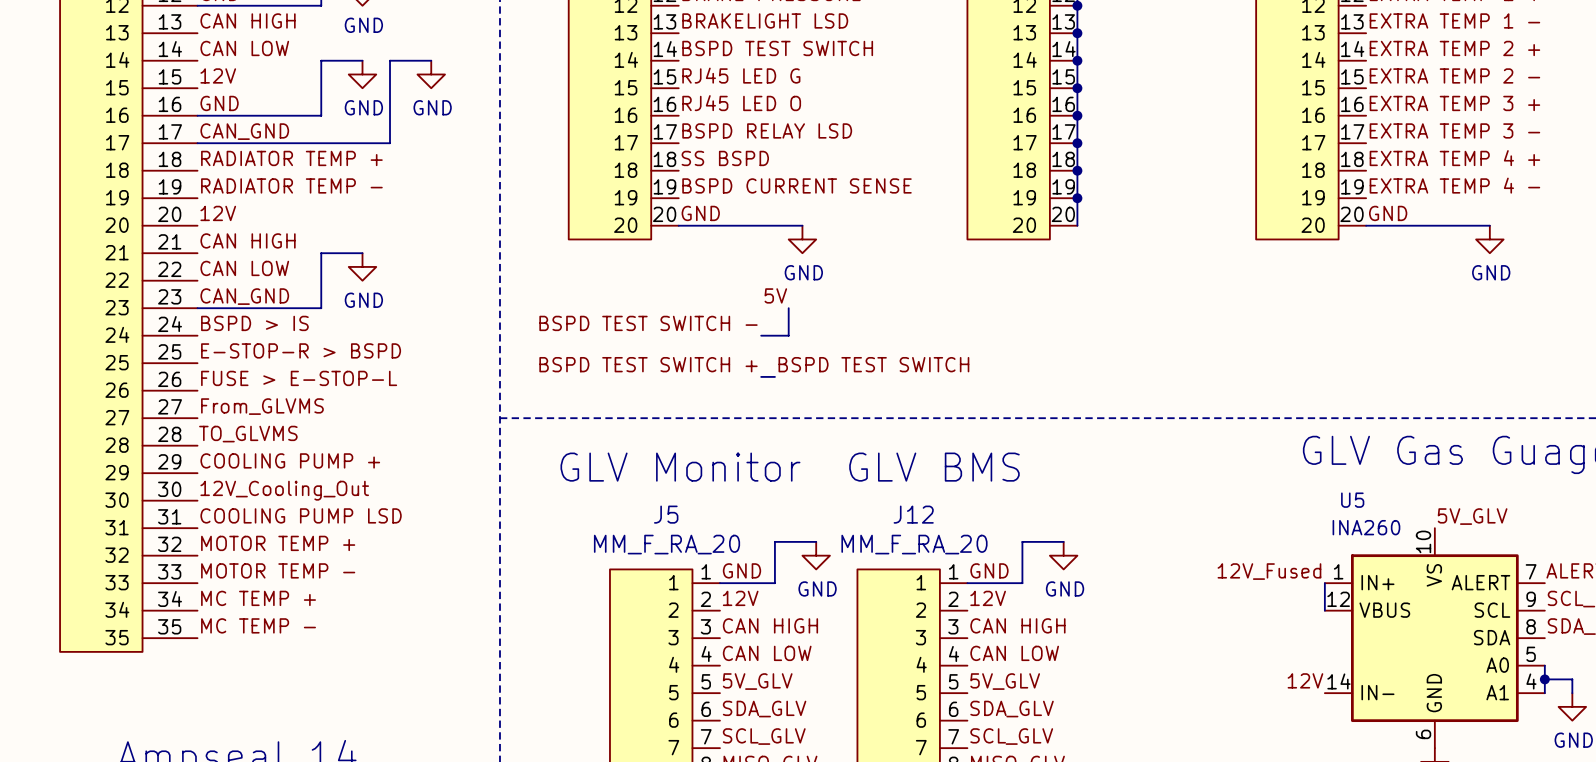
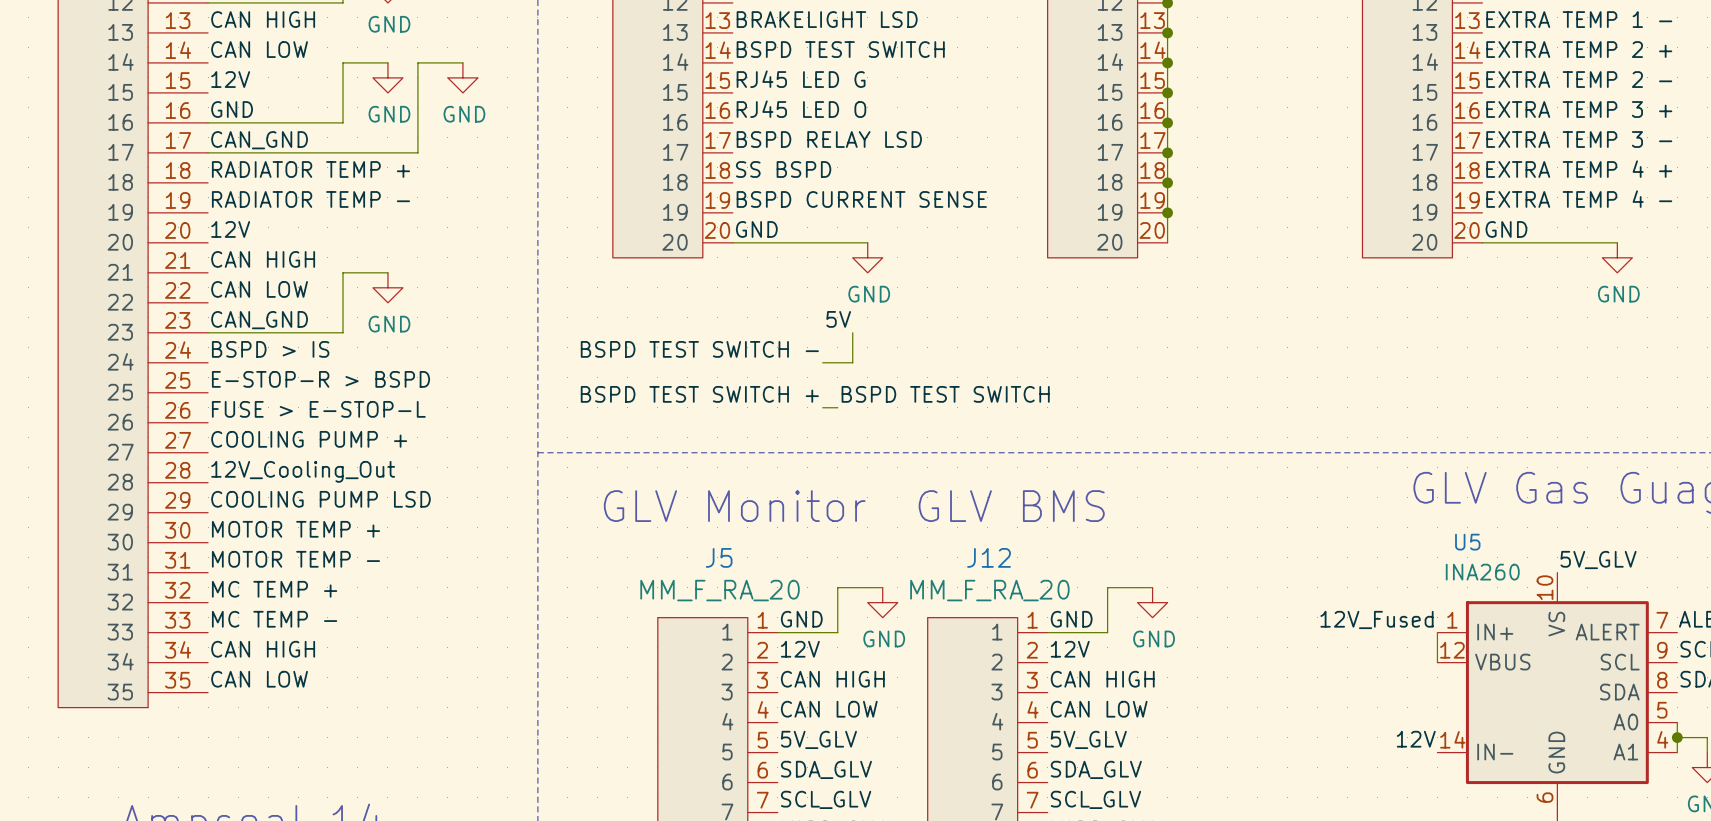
label: From_GLVMS (262, 406) -> COOLING PUMP + (309, 439)
label: TO_GLVMS (248, 434) -> 12V_Cooling_Out (303, 471)
label: COOLING PUMP + (290, 460) -> COOLING PUMP LSD (320, 499)
label: 12V_Cooling_Out (284, 490) -> MOTOR TEMP + (295, 529)
label: COOLING PUMP LSD (301, 515) -> MOTOR TEMP - (295, 559)
label: MOTOR TEMP + (278, 543) -> MC TEMP + (274, 589)
label: MOTOR TEMP - (278, 570) -> MC TEMP - (274, 619)
label: MC TEMP + (258, 598) -> CAN HIGH (263, 649)
label: MC TEMP - (258, 625) -> CAN LOW (259, 679)

